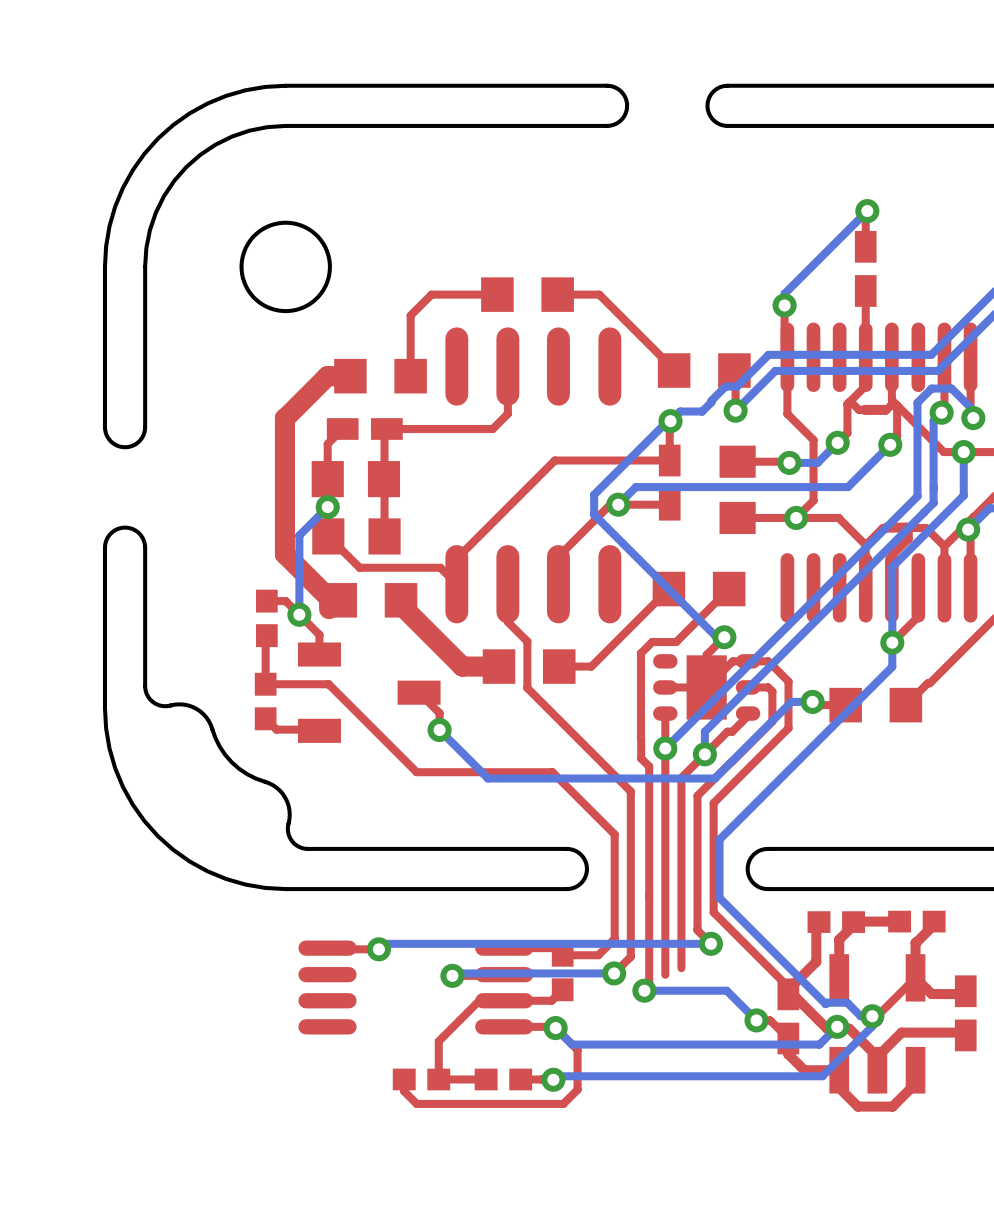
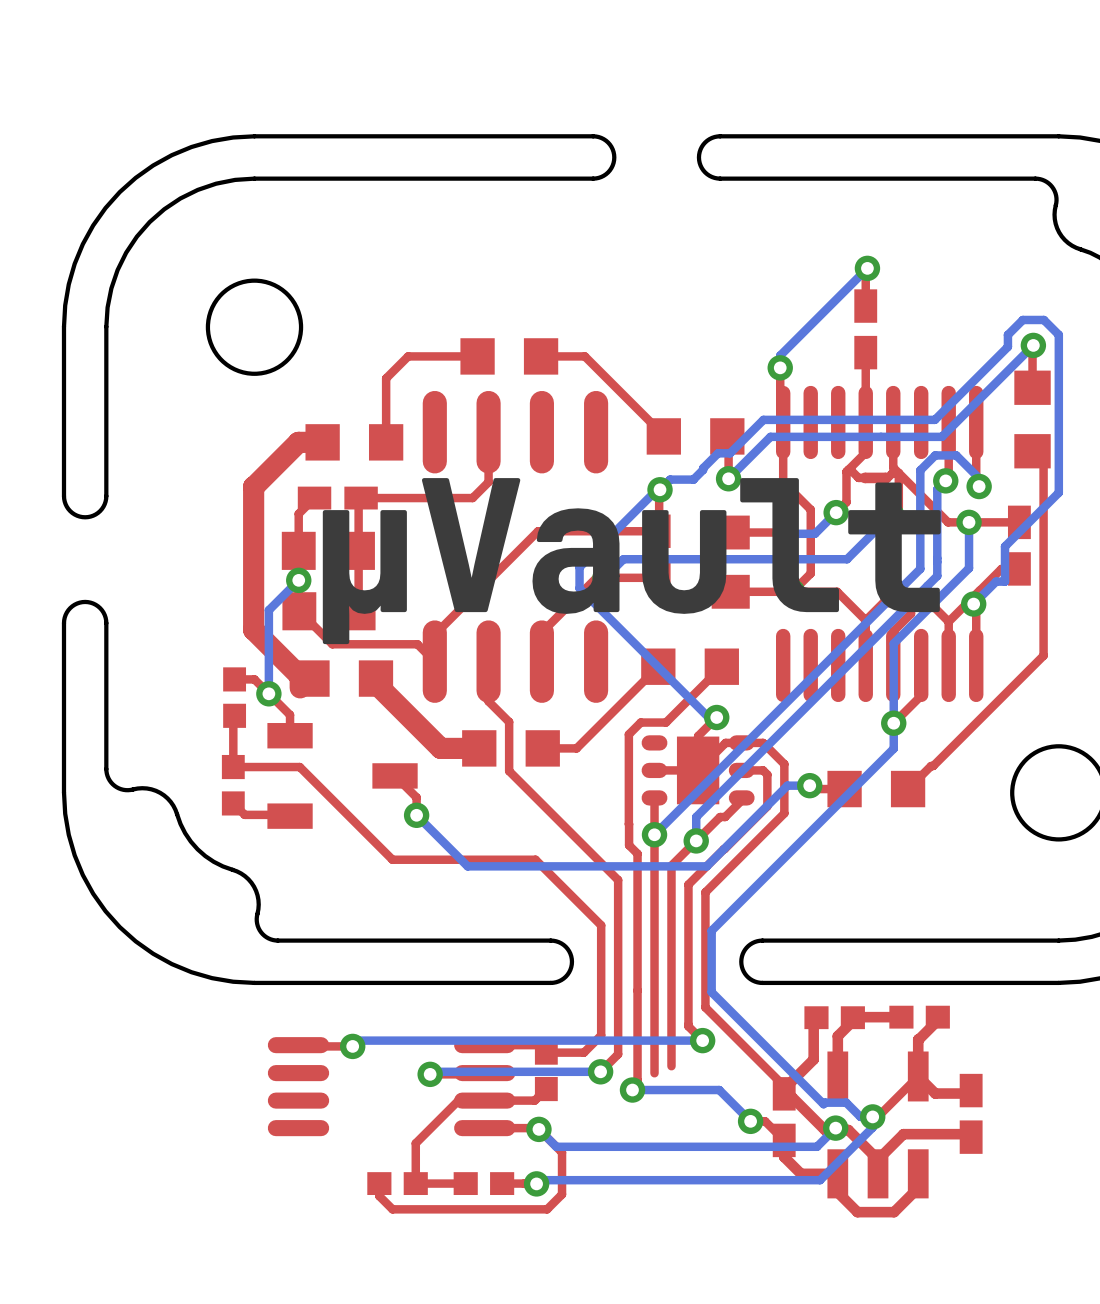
drawing: none -> [322, 478, 941, 645]

